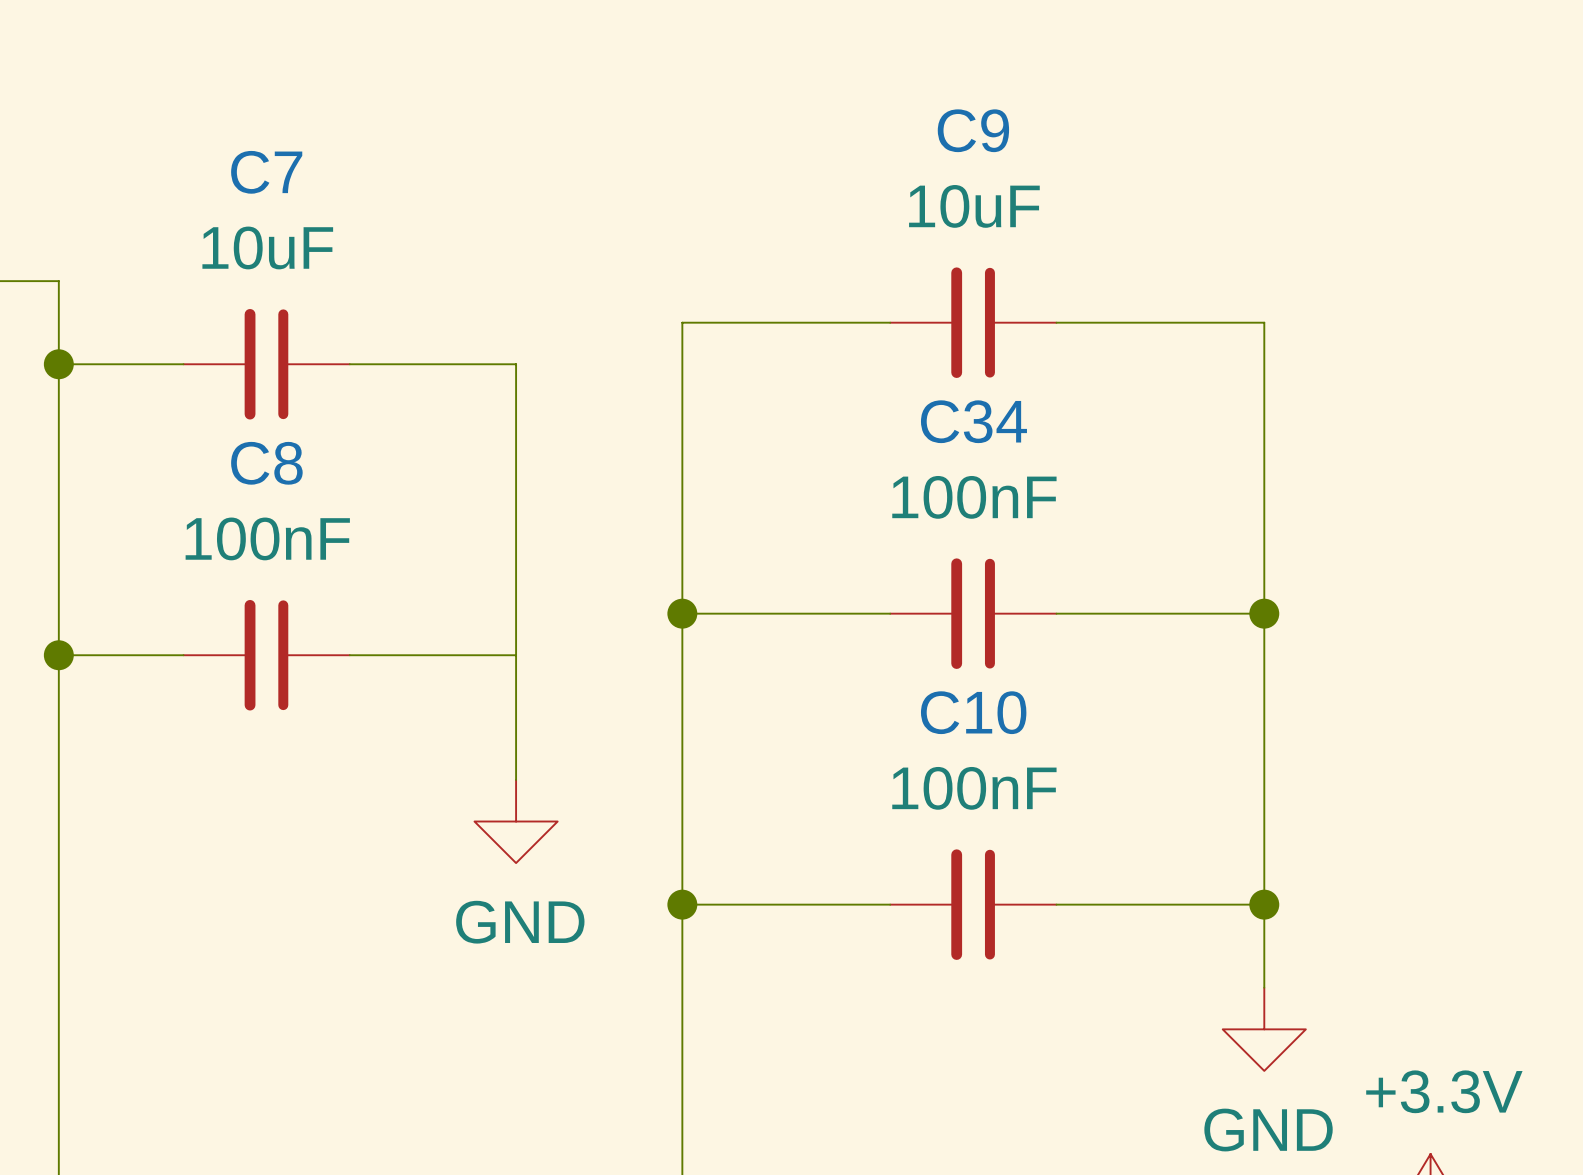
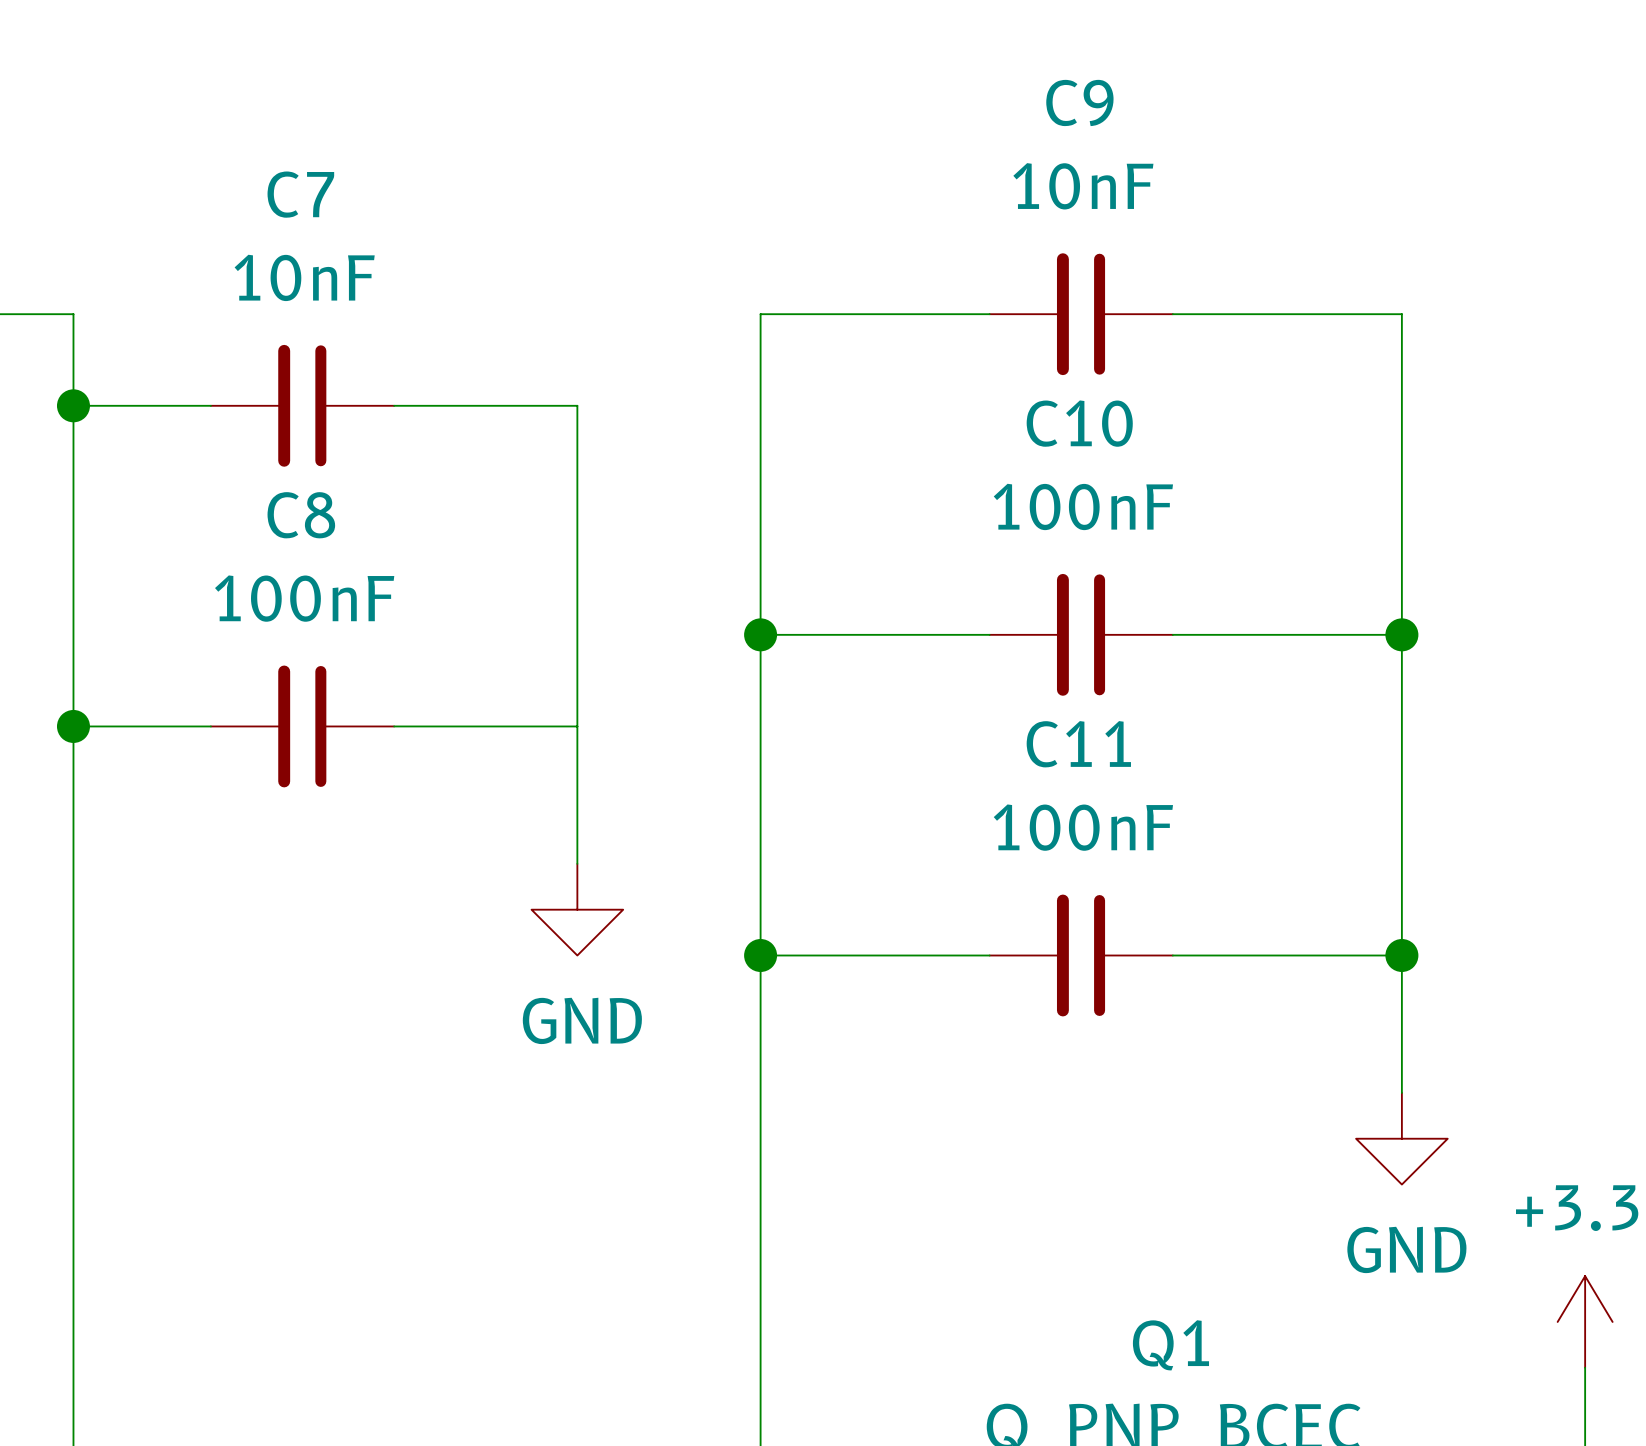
C9 value: 10uF (974, 206) -> 10nF (1083, 186)
C7 value: 10uF (267, 247) -> 10nF (304, 277)
wire: (682, 322) (890, 322) -> (760, 360) (760, 314) (989, 314)
C9 position: (973, 322) -> (1081, 314)
wire: (1056, 322) (1264, 322) -> (1172, 314) (1401, 314) (1401, 360)
wire: (682, 613) (890, 613) -> (760, 634) (989, 634)
junction position: (682, 613) -> (760, 634)
C34: 100nF (973, 613) -> none
wire: (1056, 613) (1264, 613) -> (1172, 634) (1401, 634)
junction position: (1264, 613) -> (1401, 634)
C11: none -> 100nF (1081, 955)
wire: (682, 904) (890, 904) -> (760, 955) (989, 955)
junction position: (682, 904) -> (760, 955)
C10 position: (973, 904) -> (1081, 634)
wire: (1056, 904) (1264, 904) -> (1172, 955) (1401, 955)
junction position: (1264, 904) -> (1401, 955)

